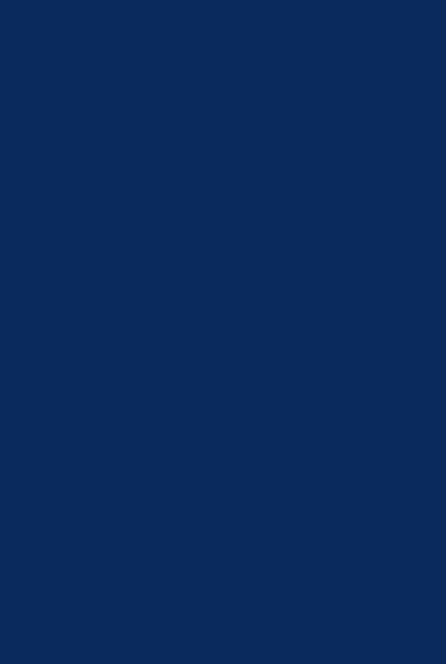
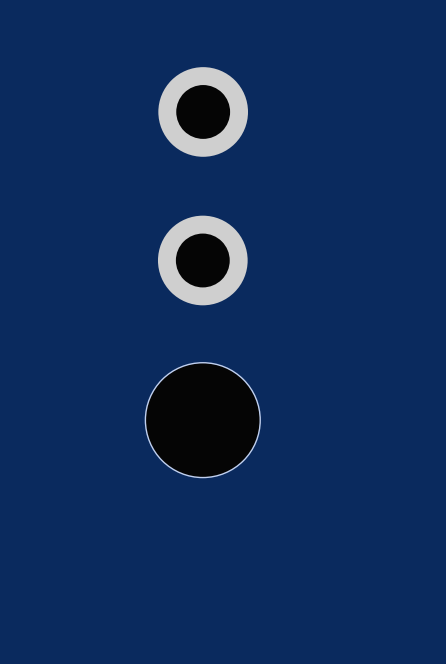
part: none -> (202, 272)

